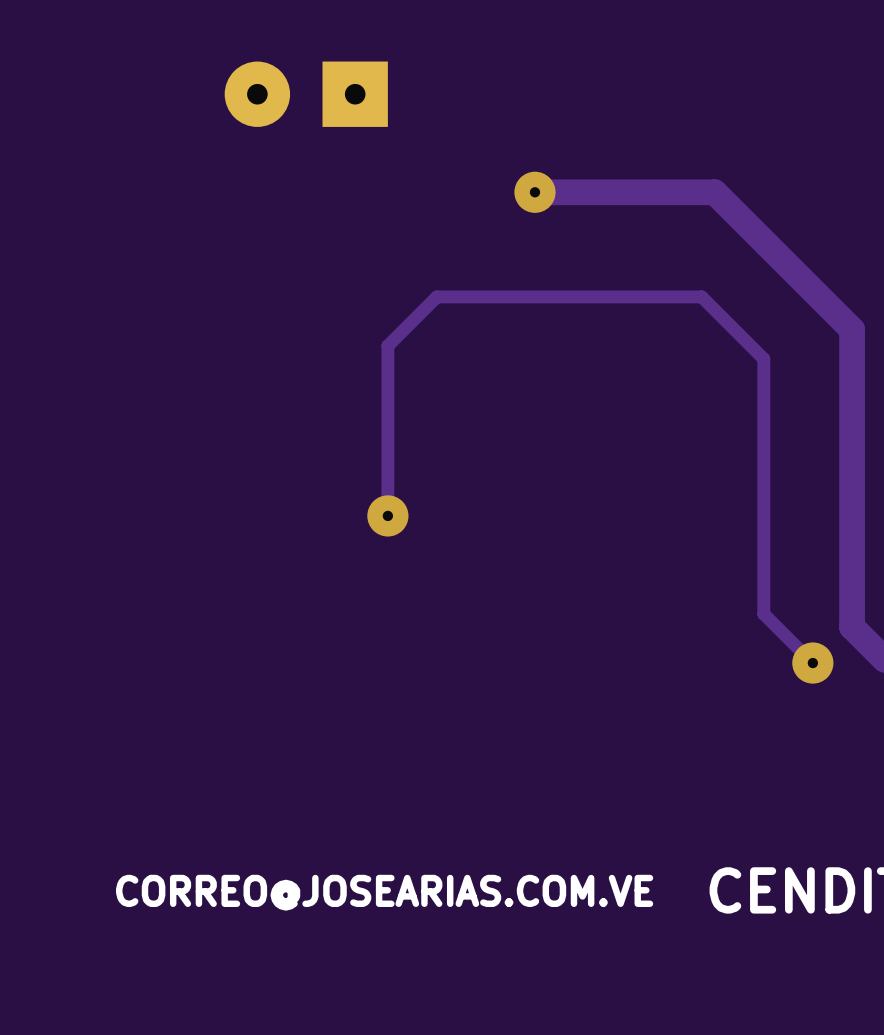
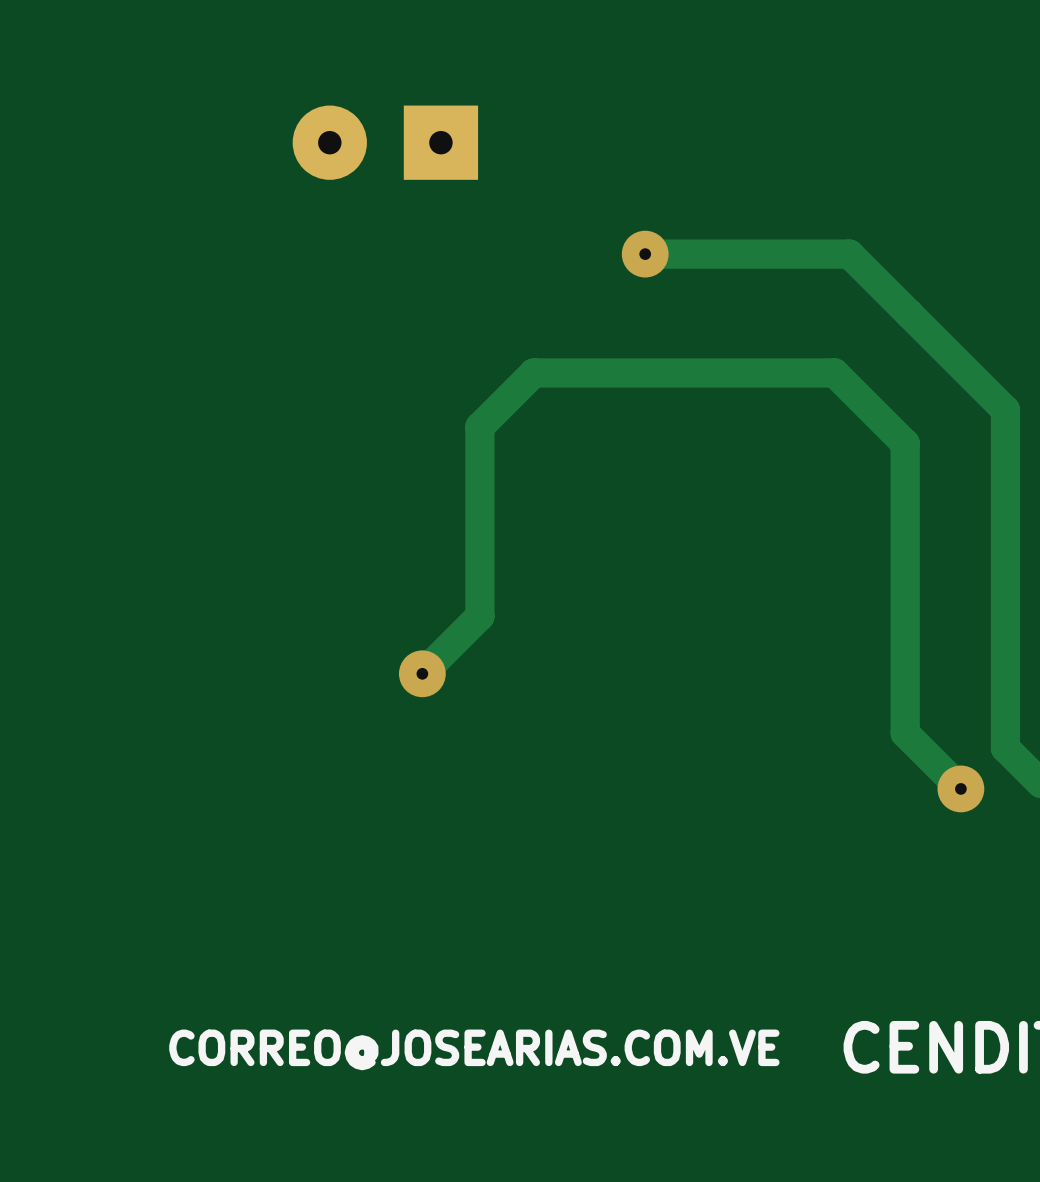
track: (389, 344) (387, 345) (387, 515) -> (479, 426) (479, 616) (422, 673)
track width: thin (389, 344) (436, 296) (701, 296) (763, 359) (763, 613) (812, 663) -> thick (479, 426) (533, 372) (834, 372) (905, 443) (905, 733) (960, 788)
via position: (387, 515) -> (422, 673)

